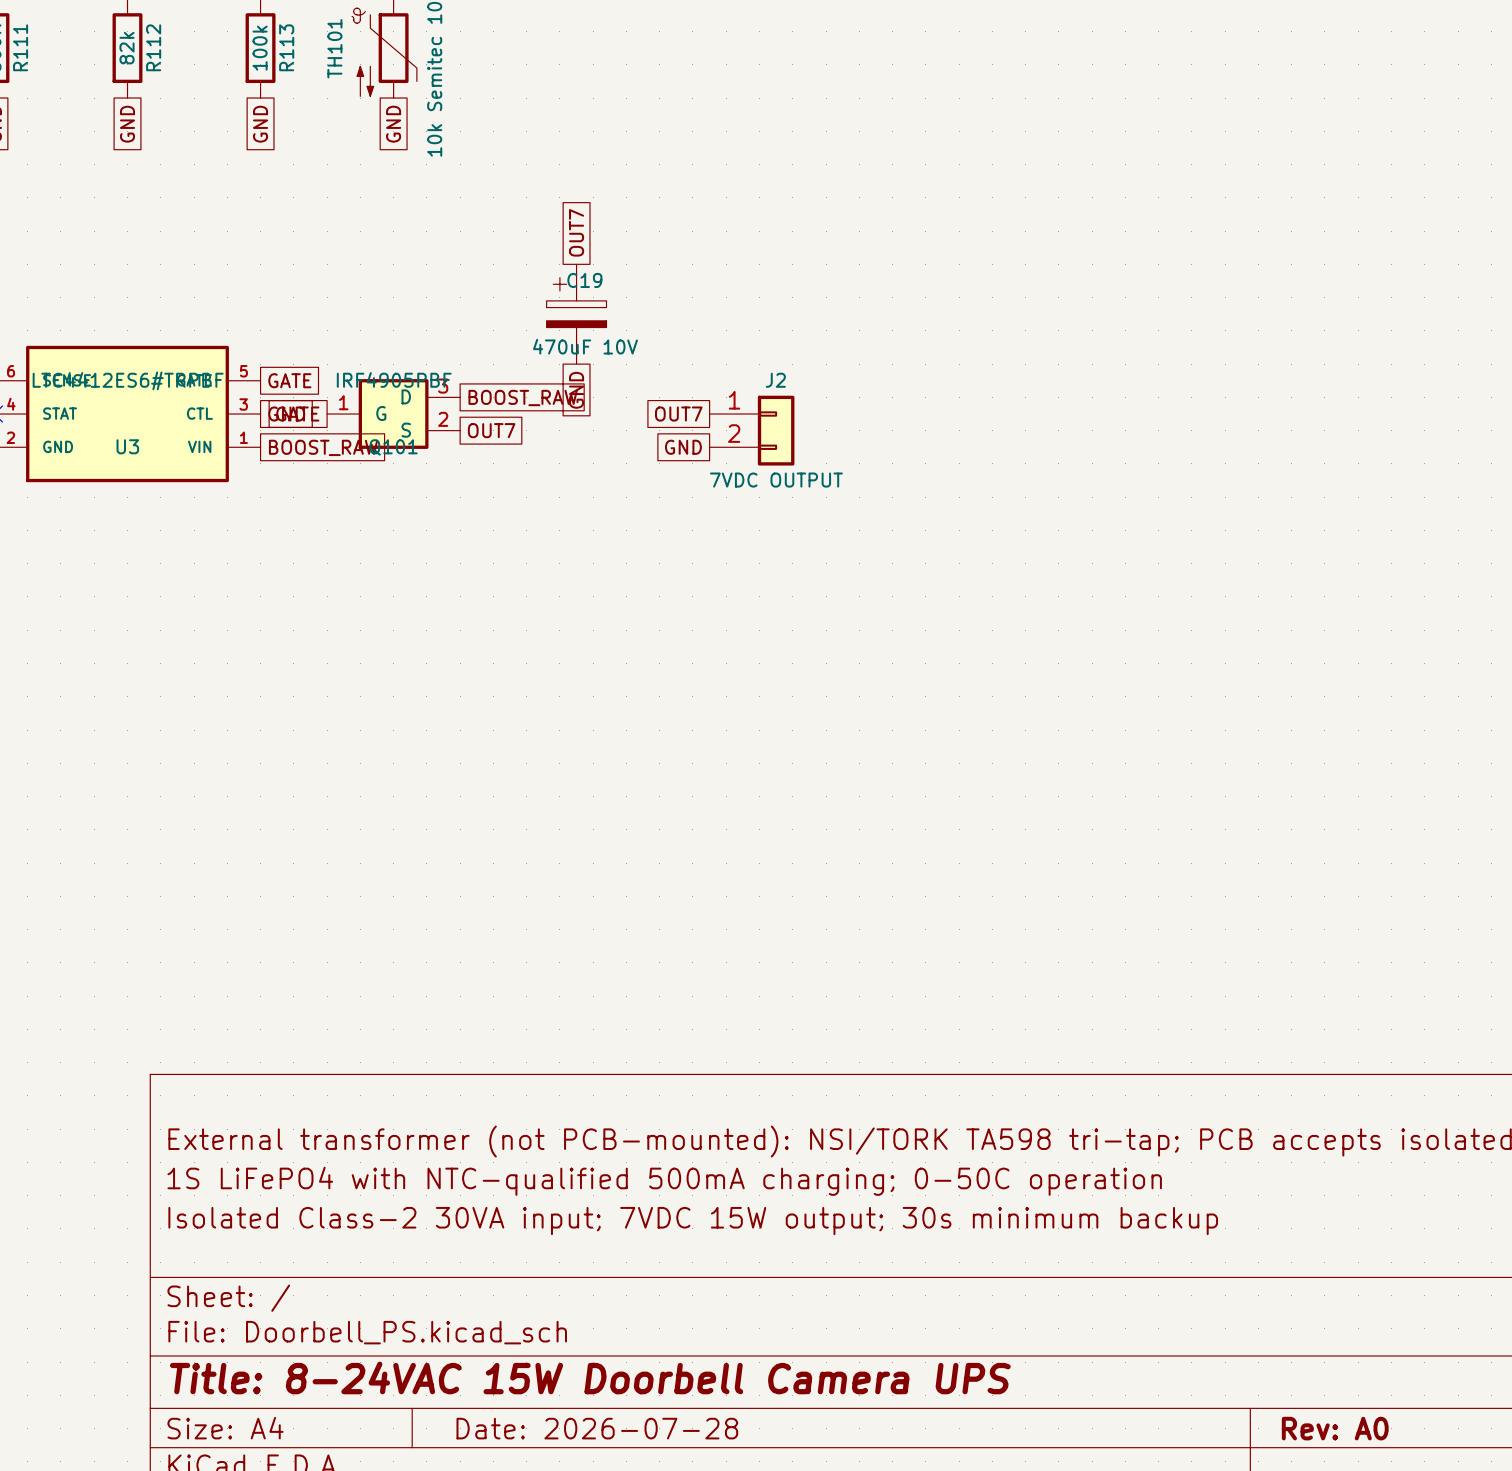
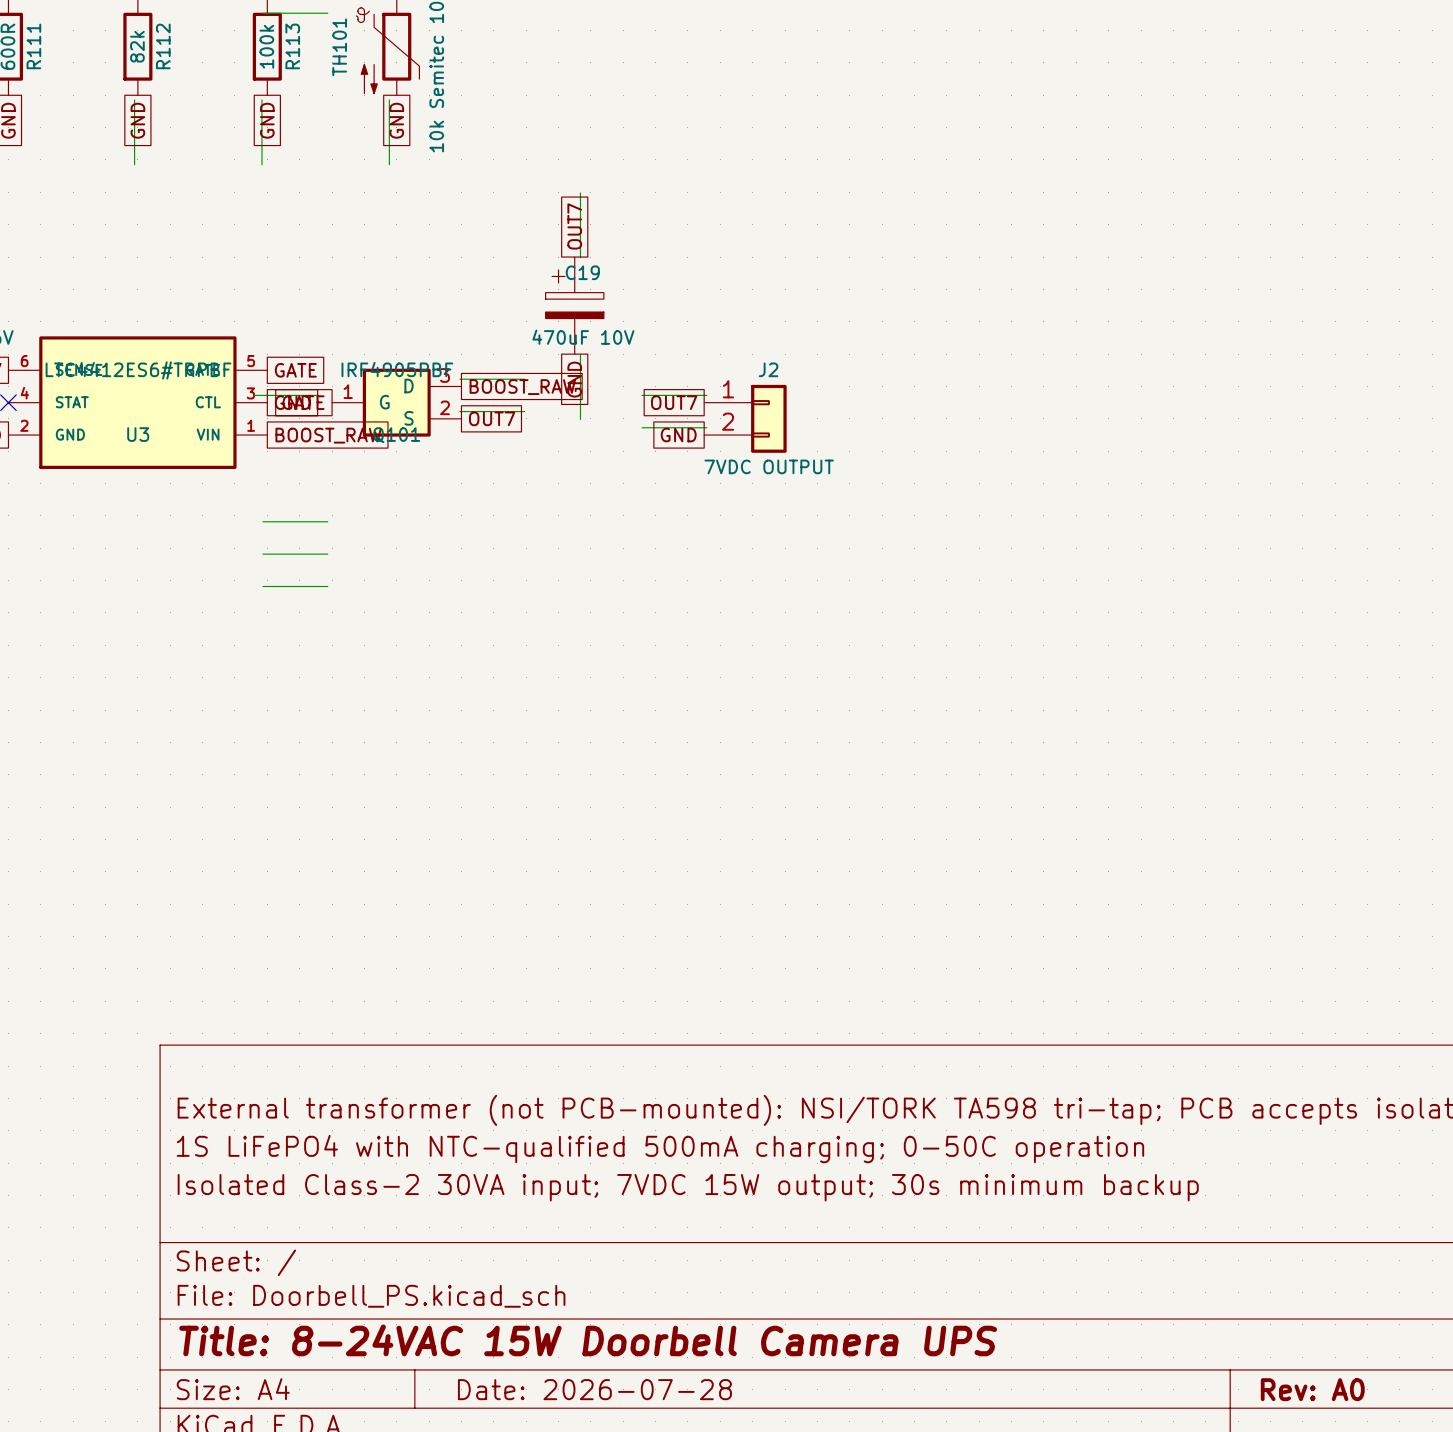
wire: none -> (262, 13) (327, 13)
wire: none -> (134, 99) (134, 164)
wire: none -> (261, 99) (261, 164)
wire: none -> (389, 99) (389, 164)
wire: none -> (580, 192) (580, 257)
wire: none -> (580, 354) (580, 419)
wire: none -> (459, 379) (524, 379)
wire: none -> (254, 395) (318, 395)
wire: none -> (642, 395) (706, 395)
wire: none -> (459, 411) (524, 411)
wire: none -> (642, 427) (706, 427)
wire: none -> (262, 521) (327, 521)
wire: none -> (262, 554) (327, 554)
wire: none -> (262, 586) (327, 586)

